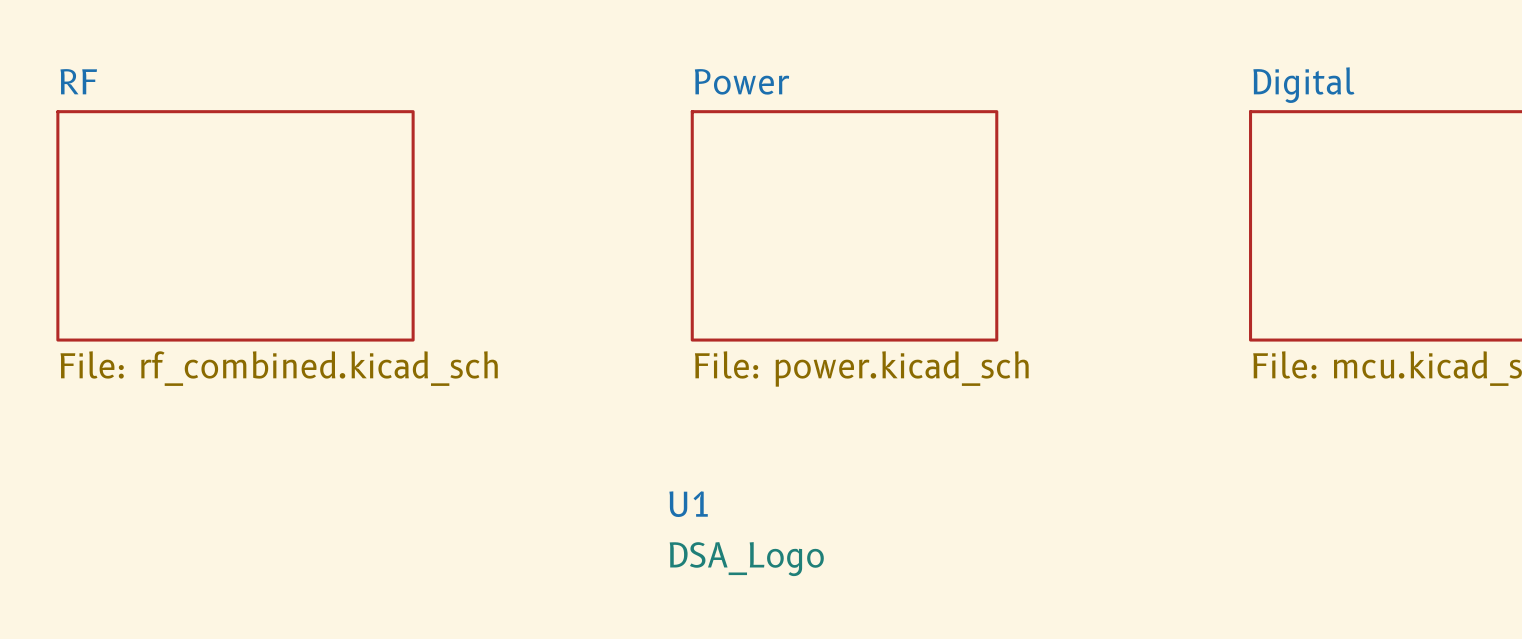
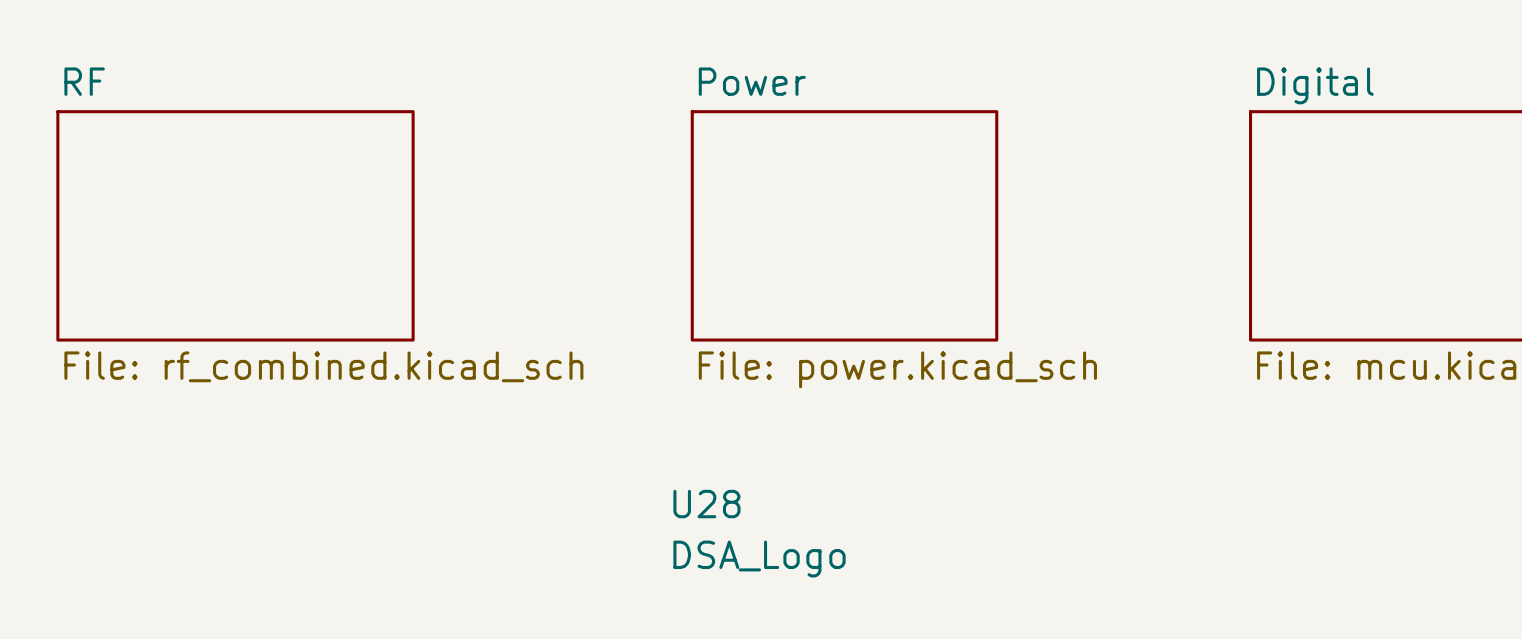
U1 name: U1 (688, 504) -> U28 (706, 504)

